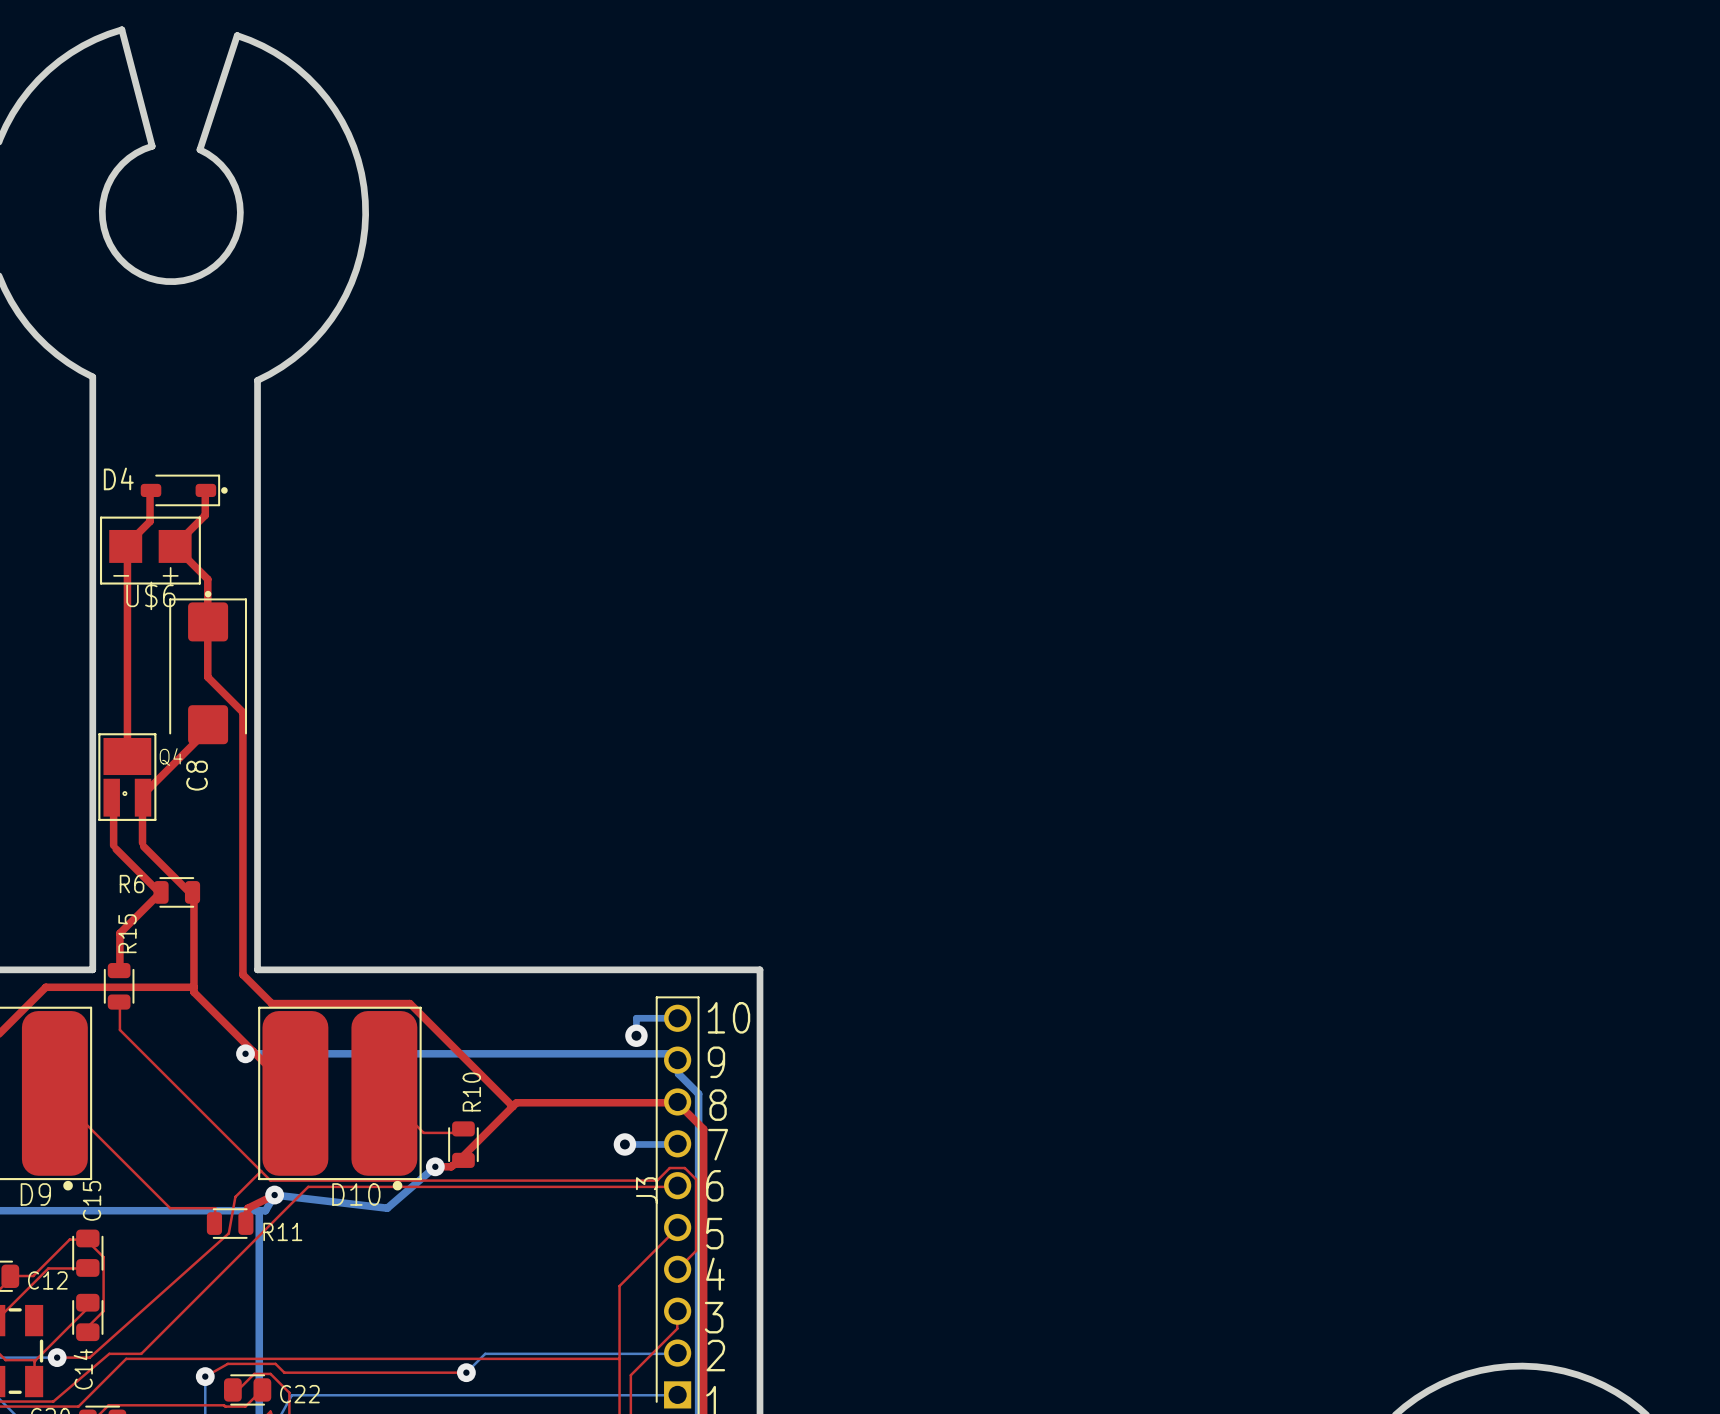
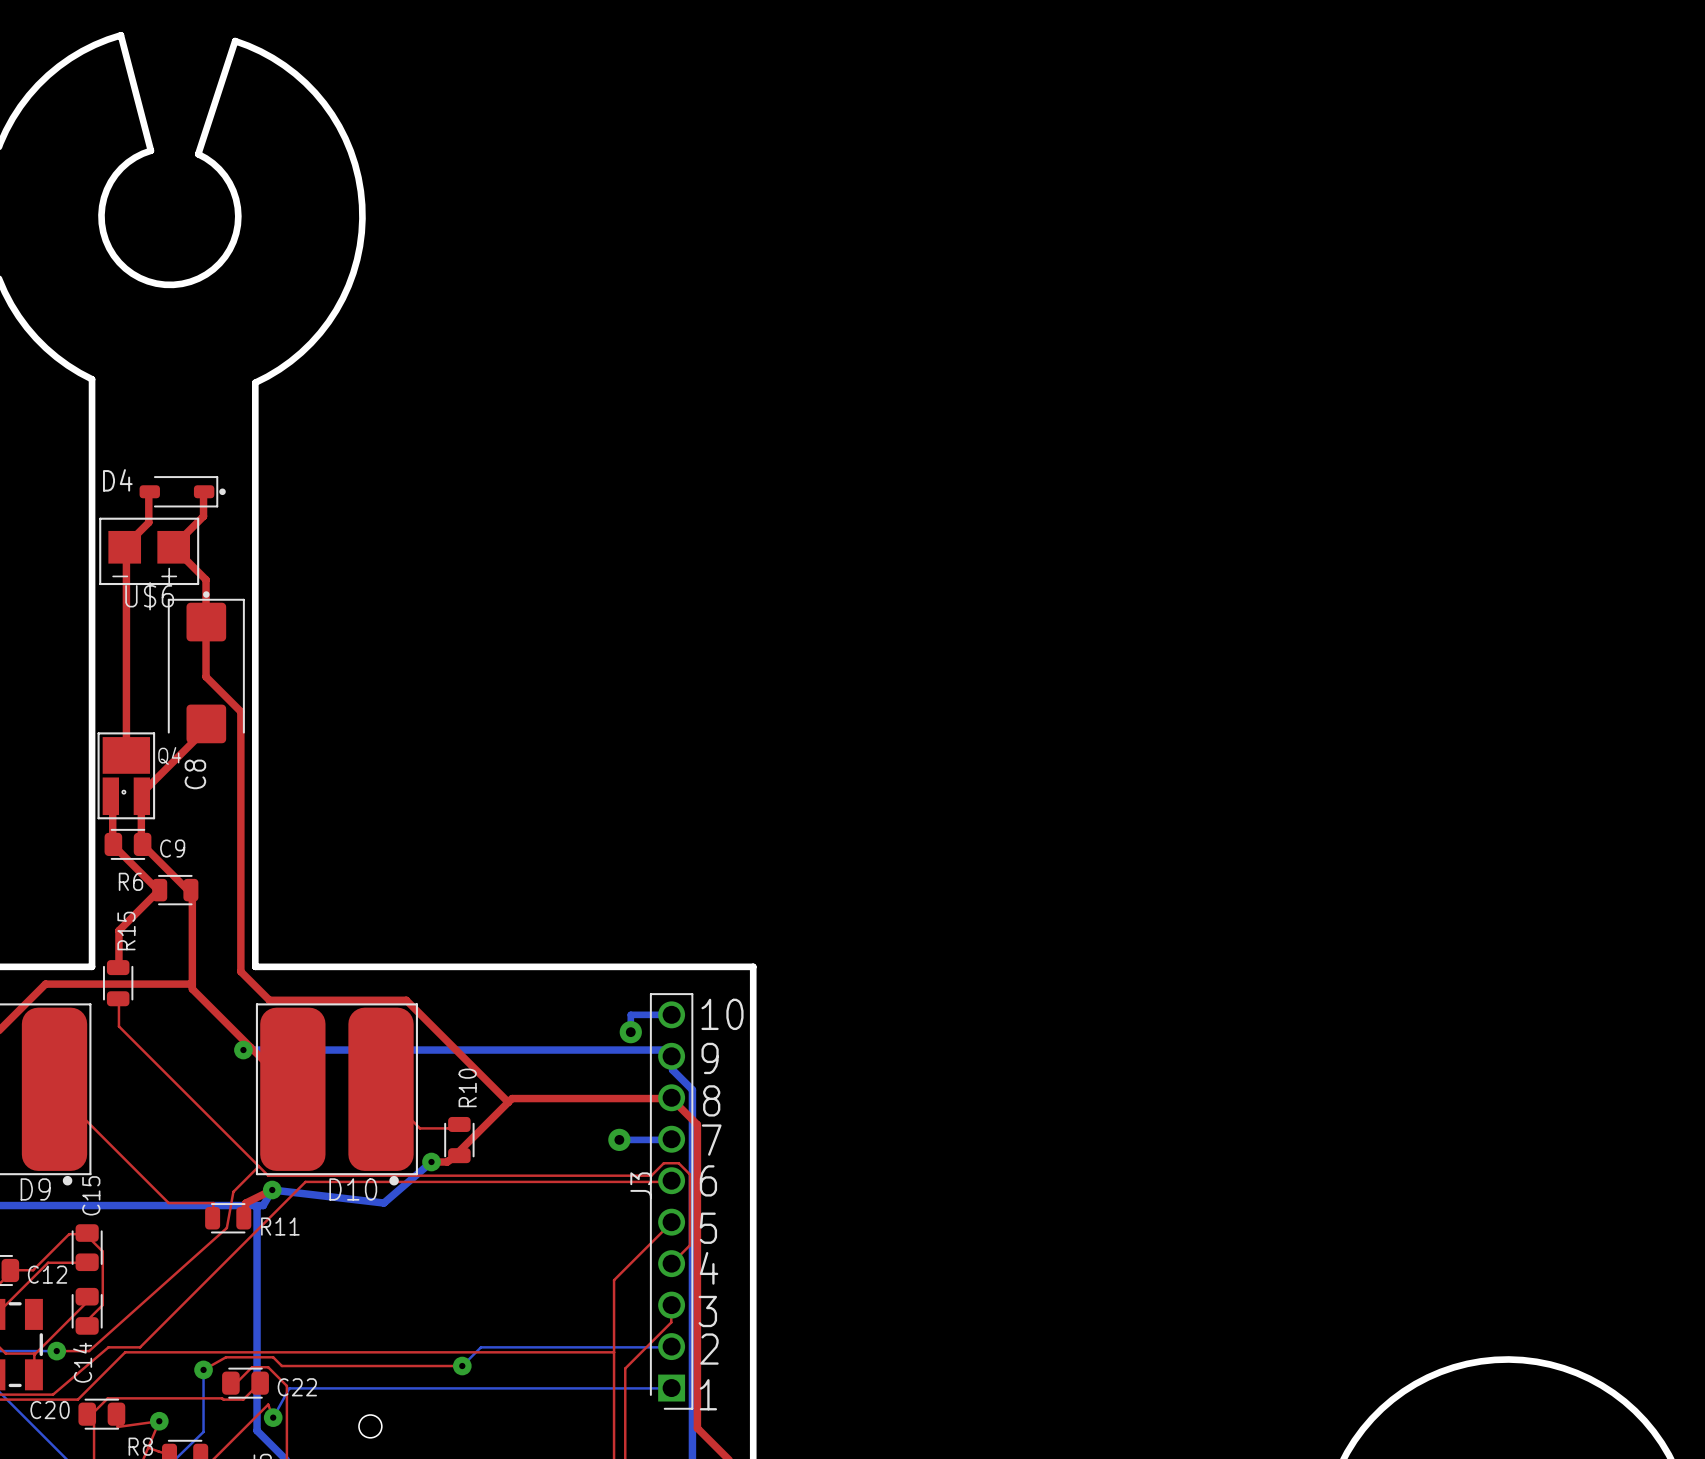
C9: none -> (127, 844)

